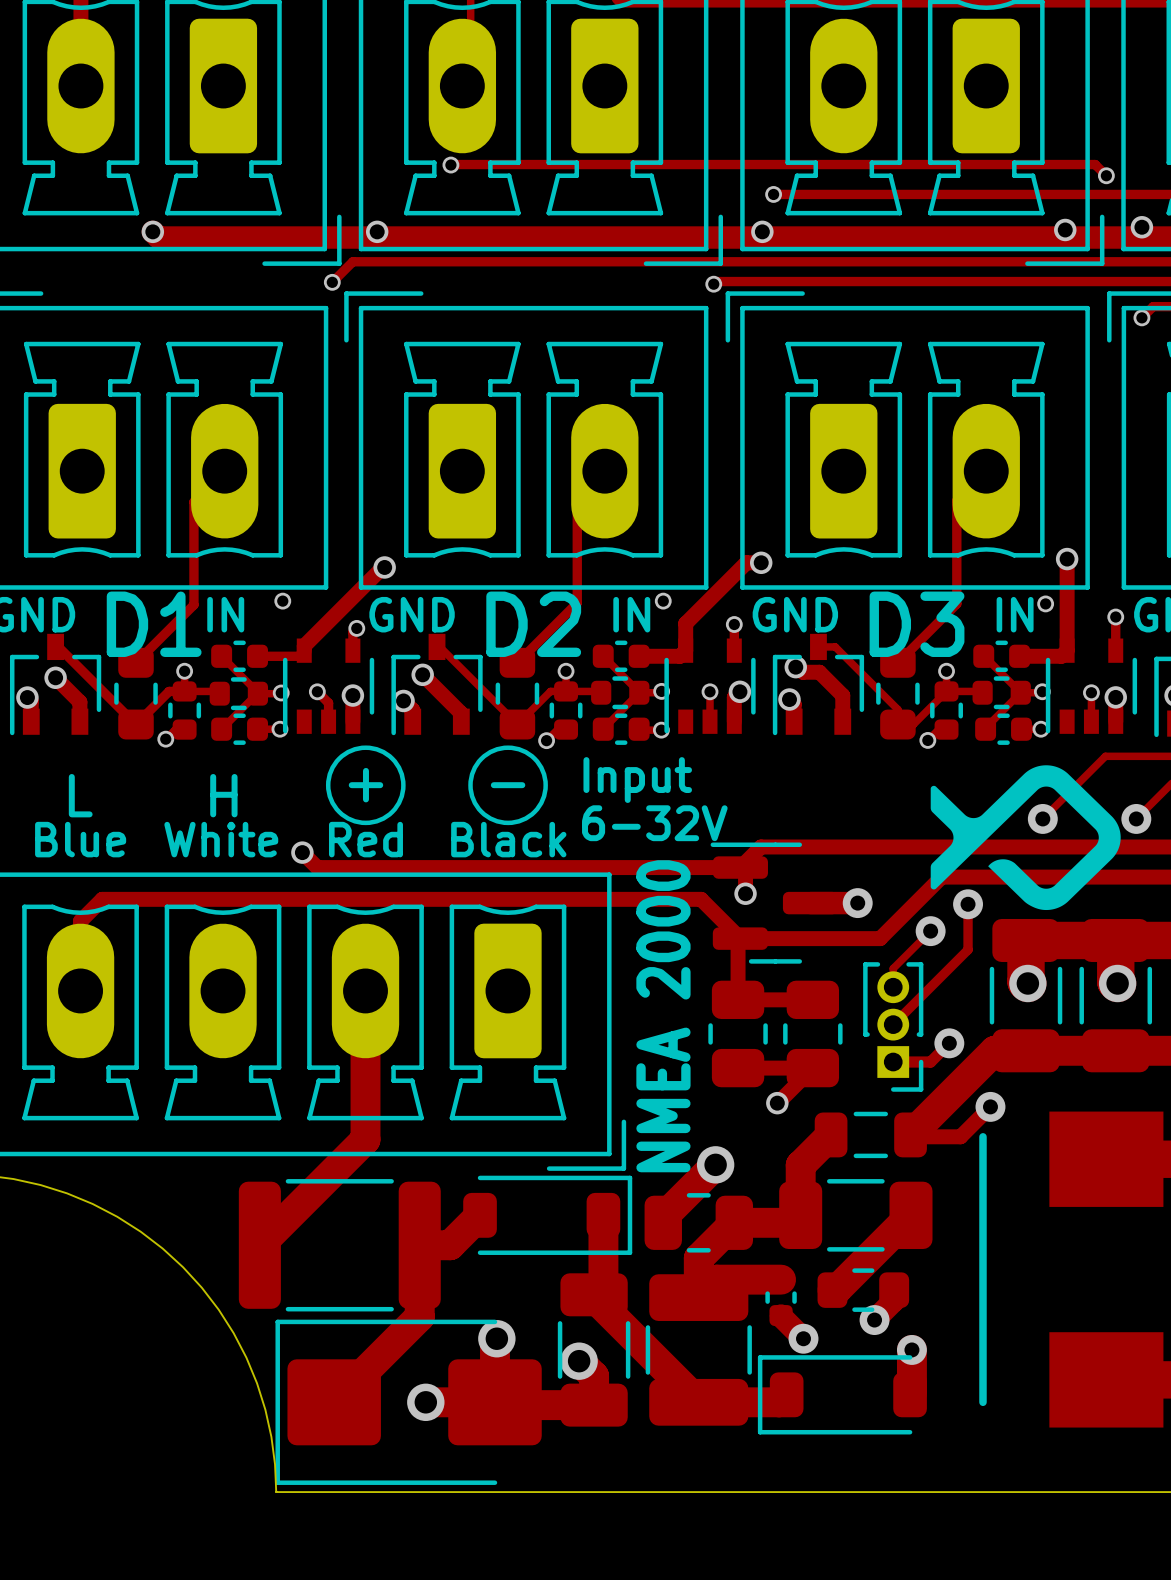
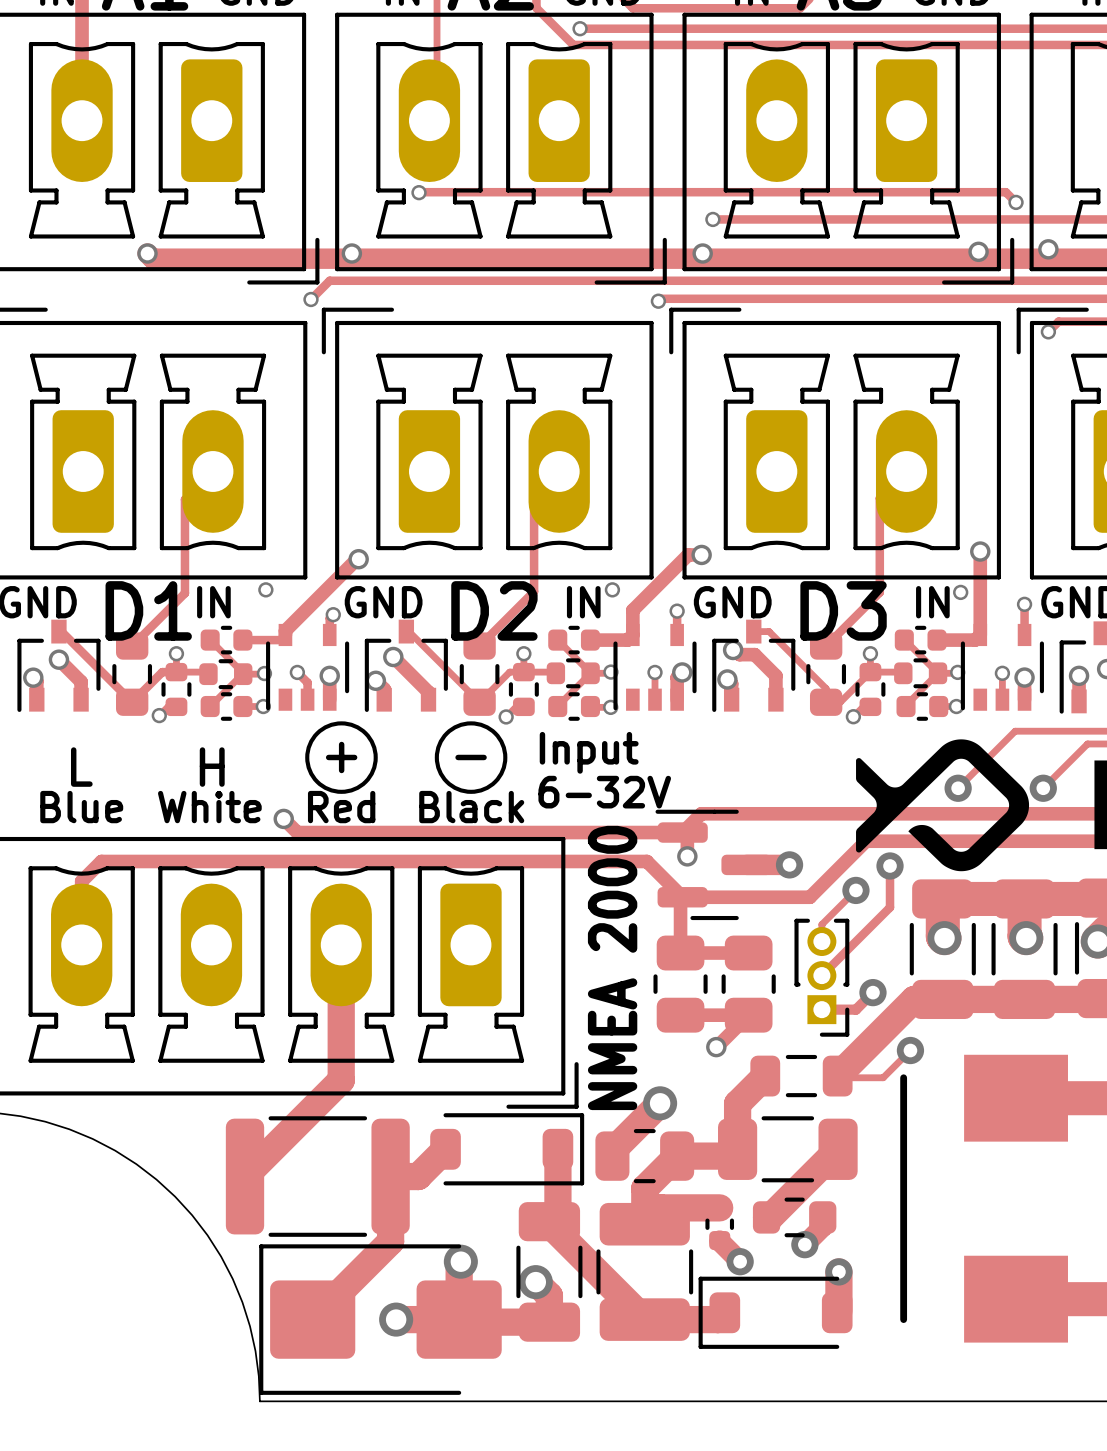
track width: thick (990, 1106) (960, 1136) (912, 1136) -> thin (910, 1050) (883, 1077) (839, 1077)

